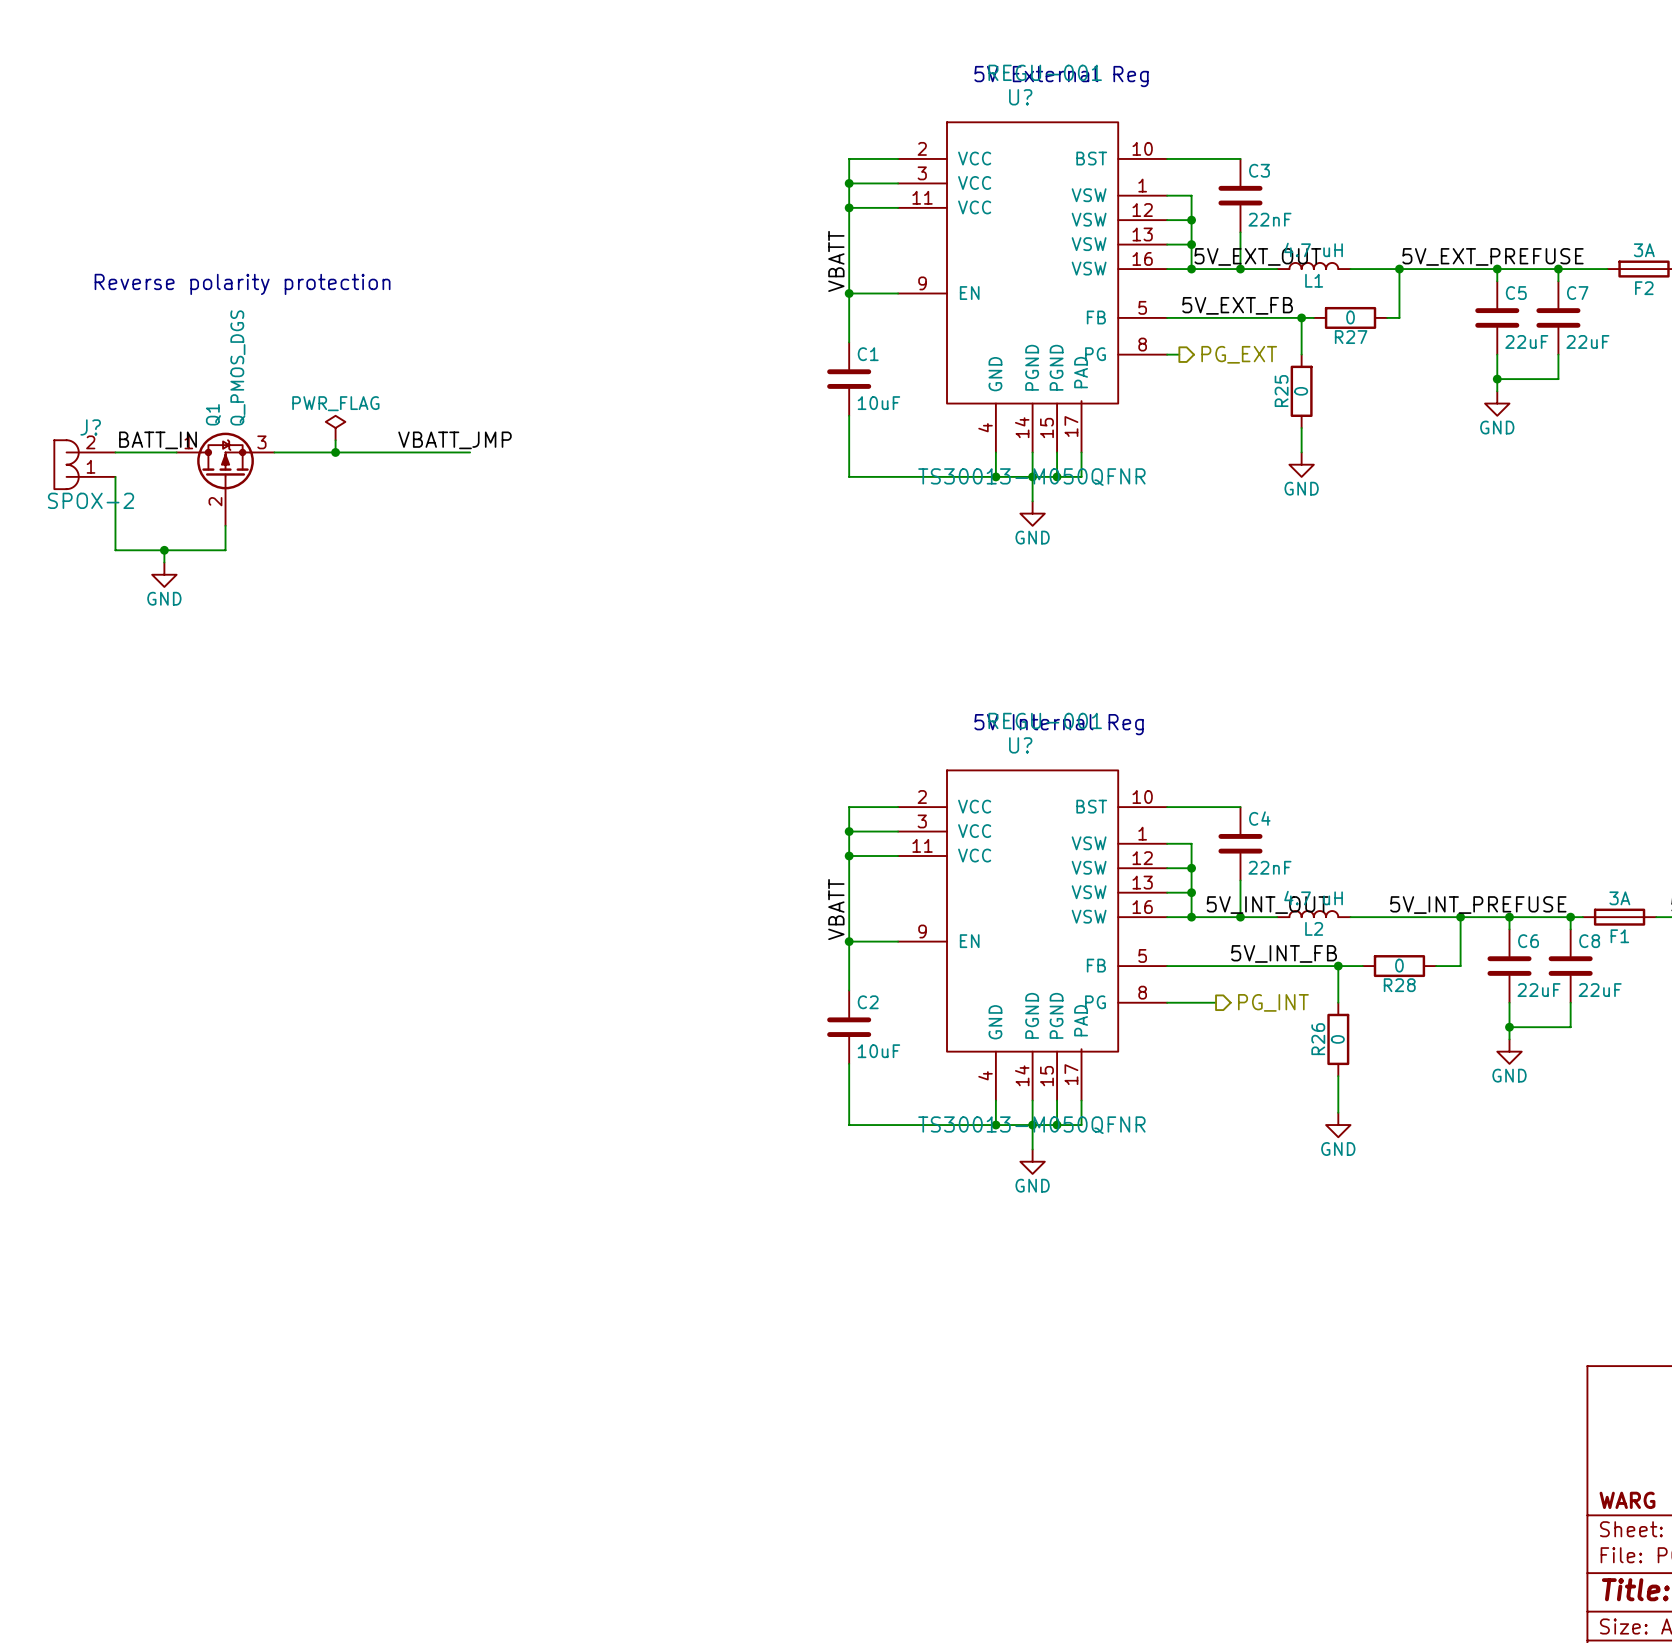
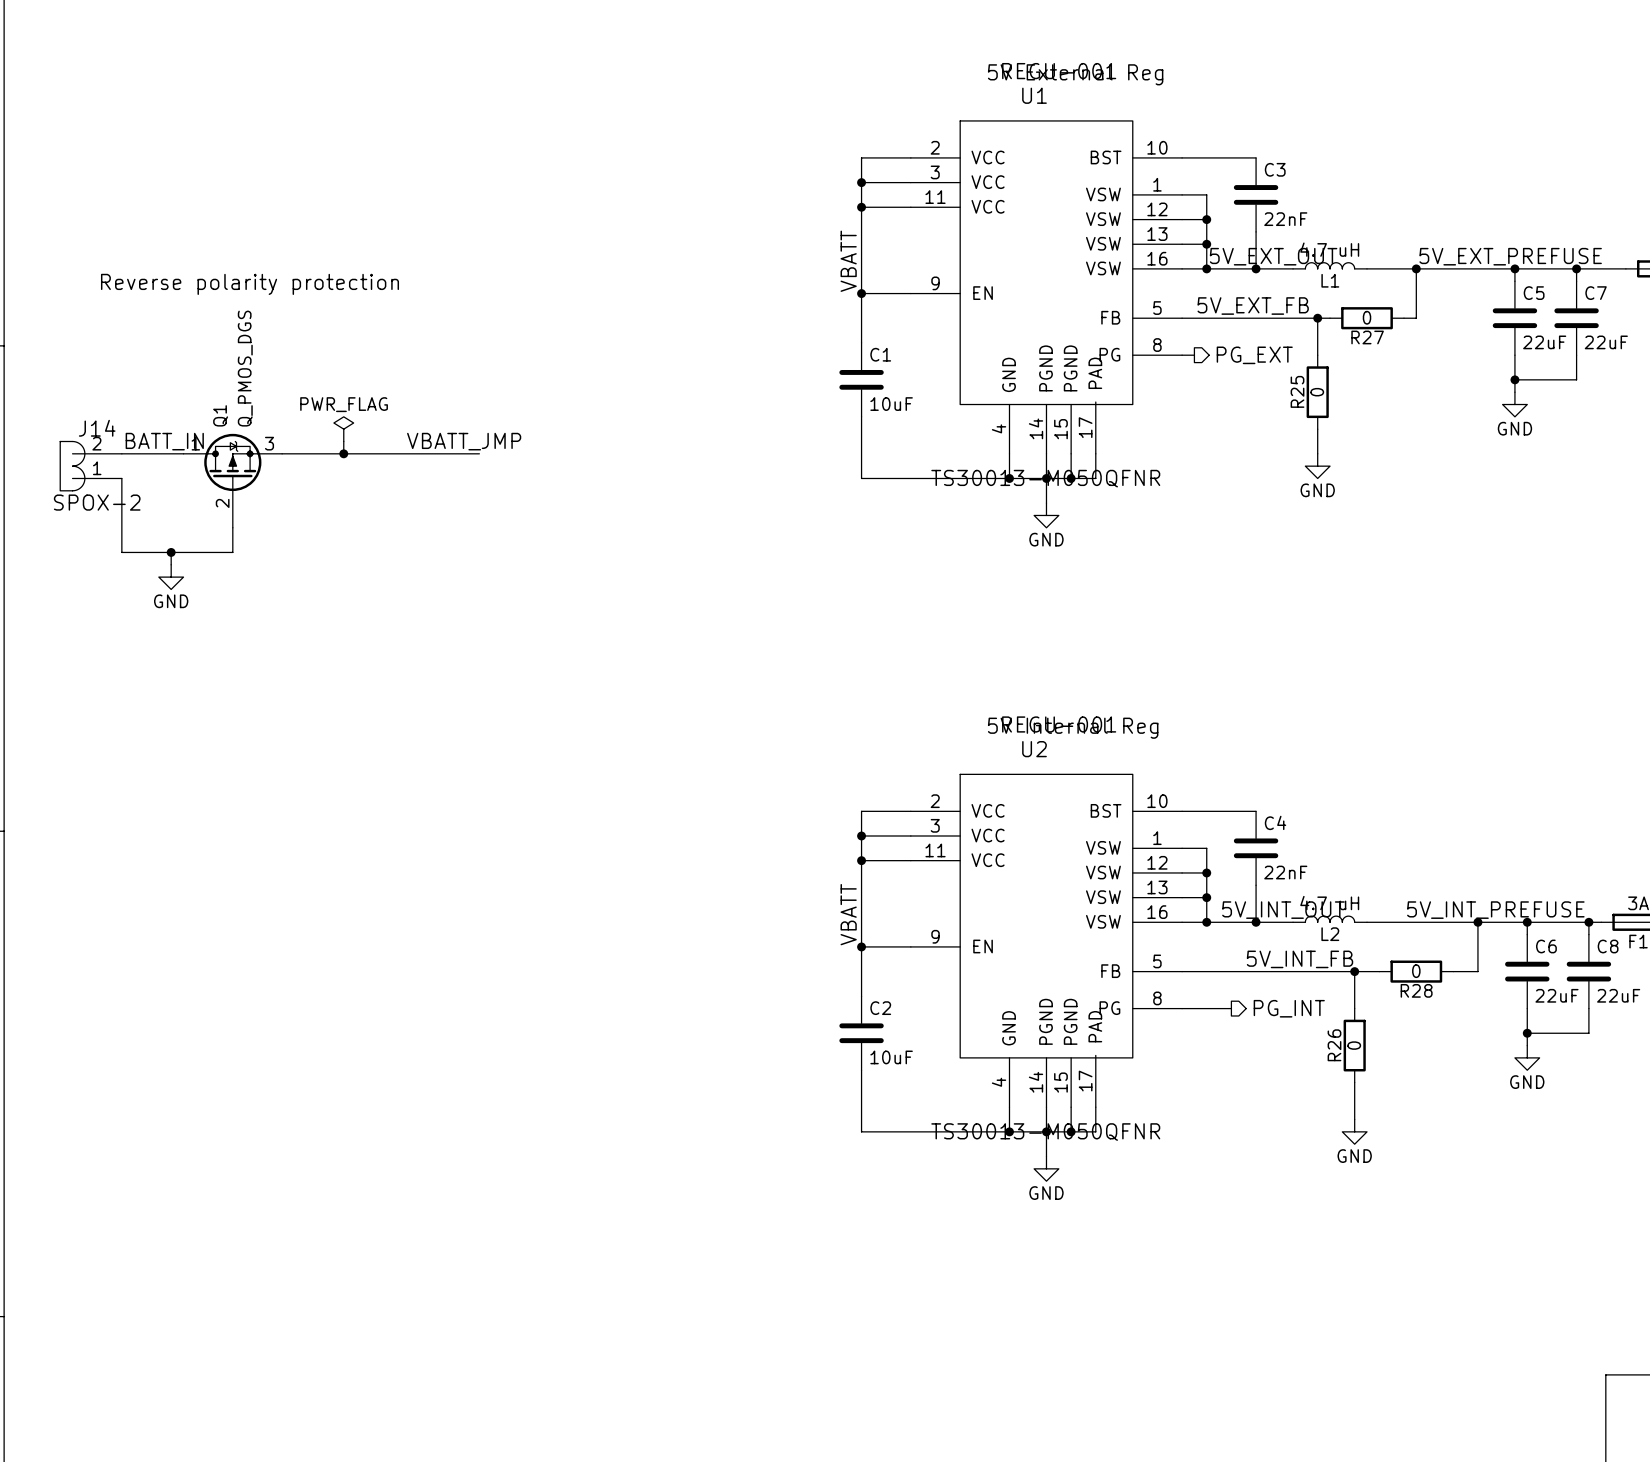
U? name: U? (1020, 97) -> U1 (1034, 95)
J? name: J? (90, 427) -> J14 (97, 428)
U? name: U? (1020, 745) -> U2 (1034, 749)

